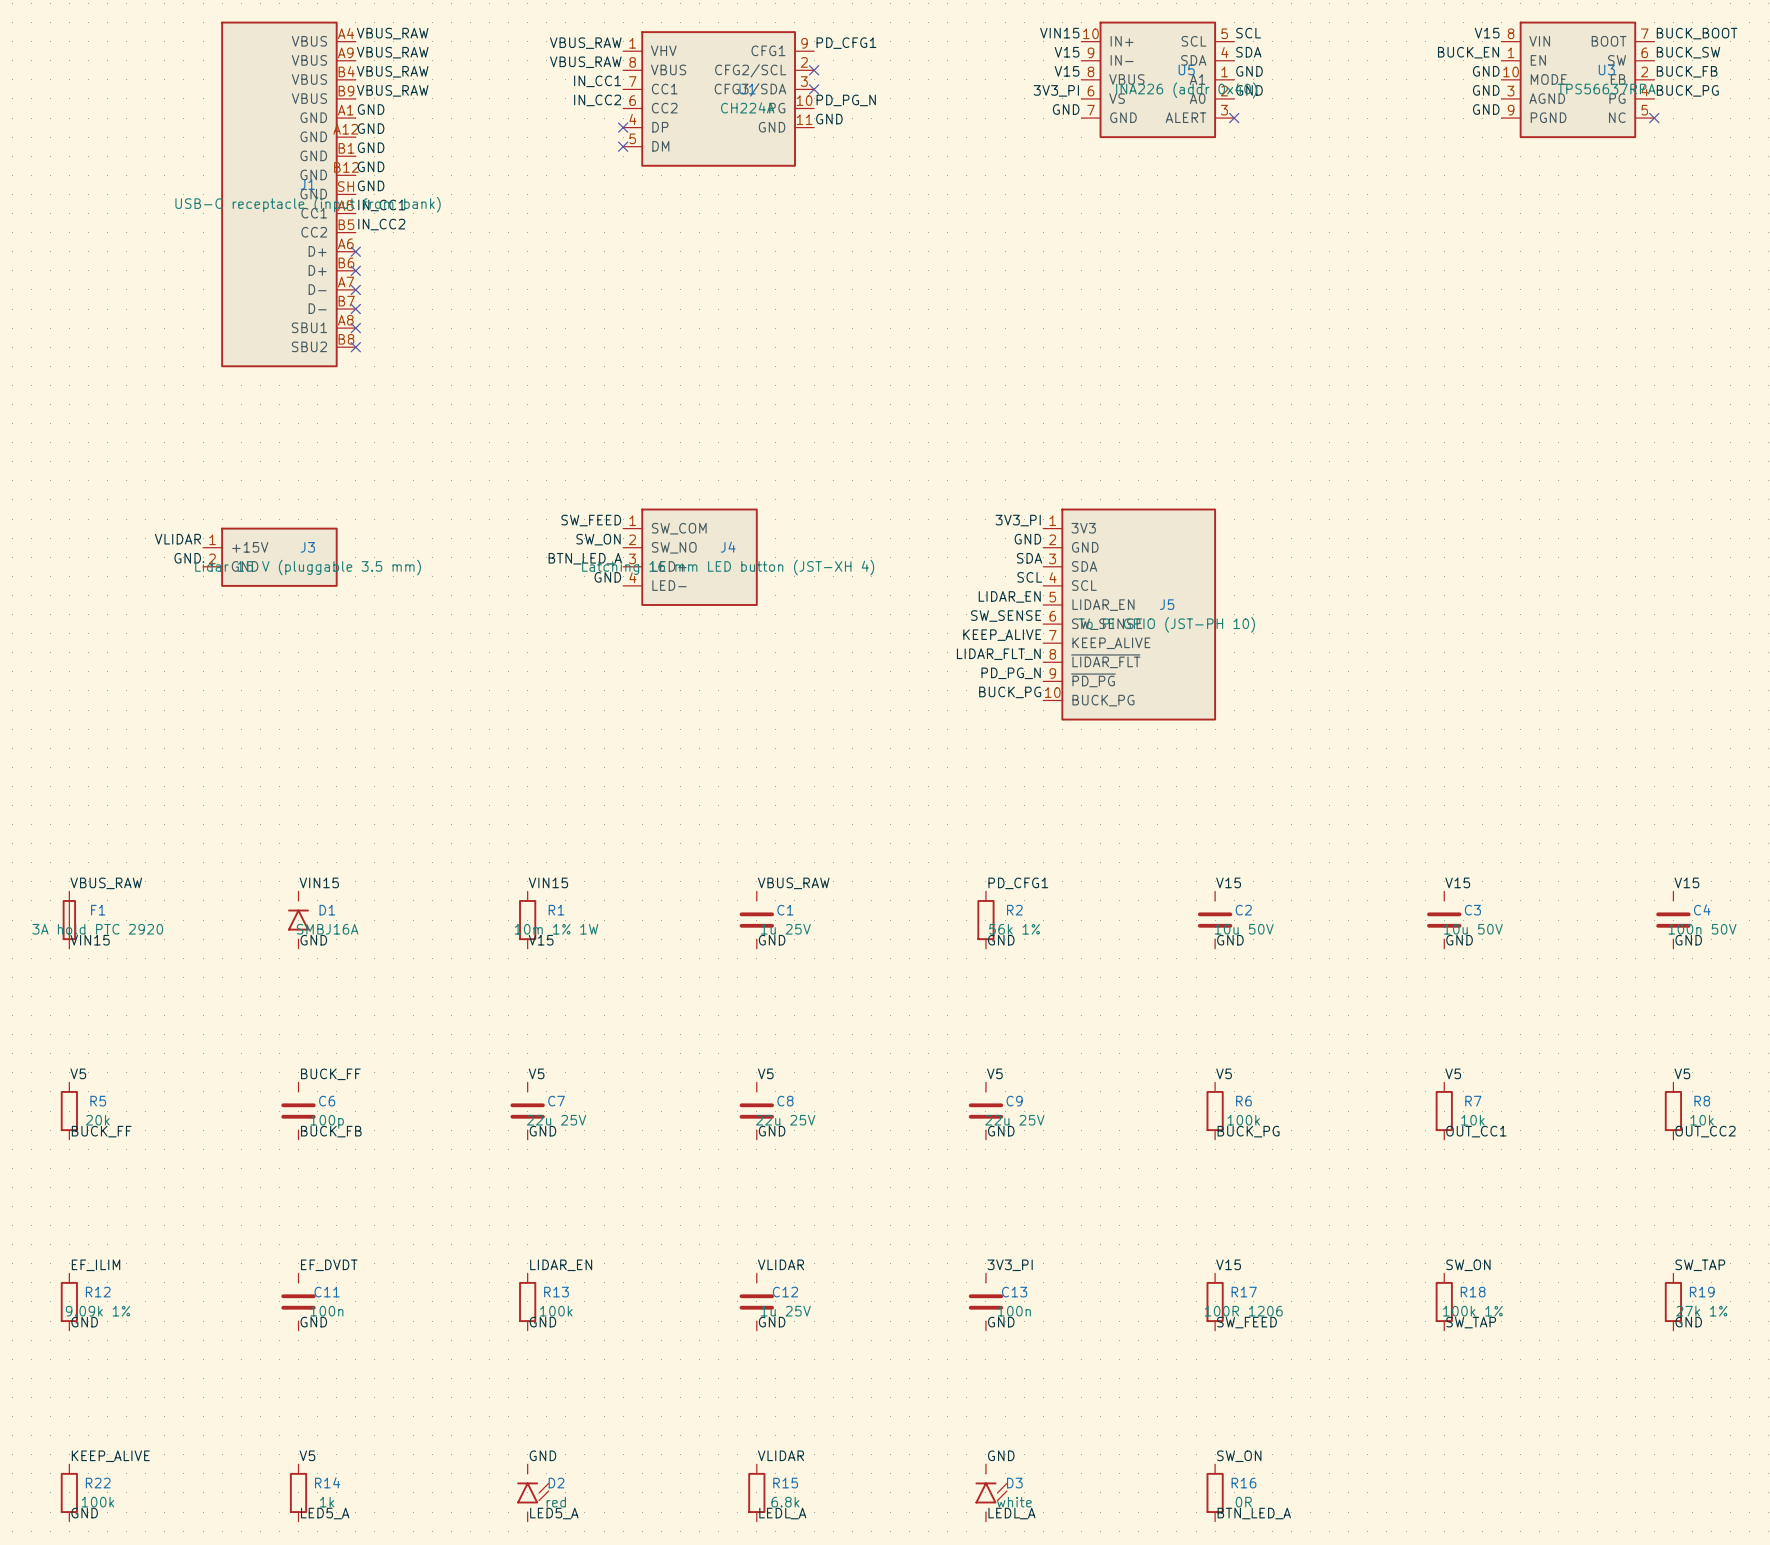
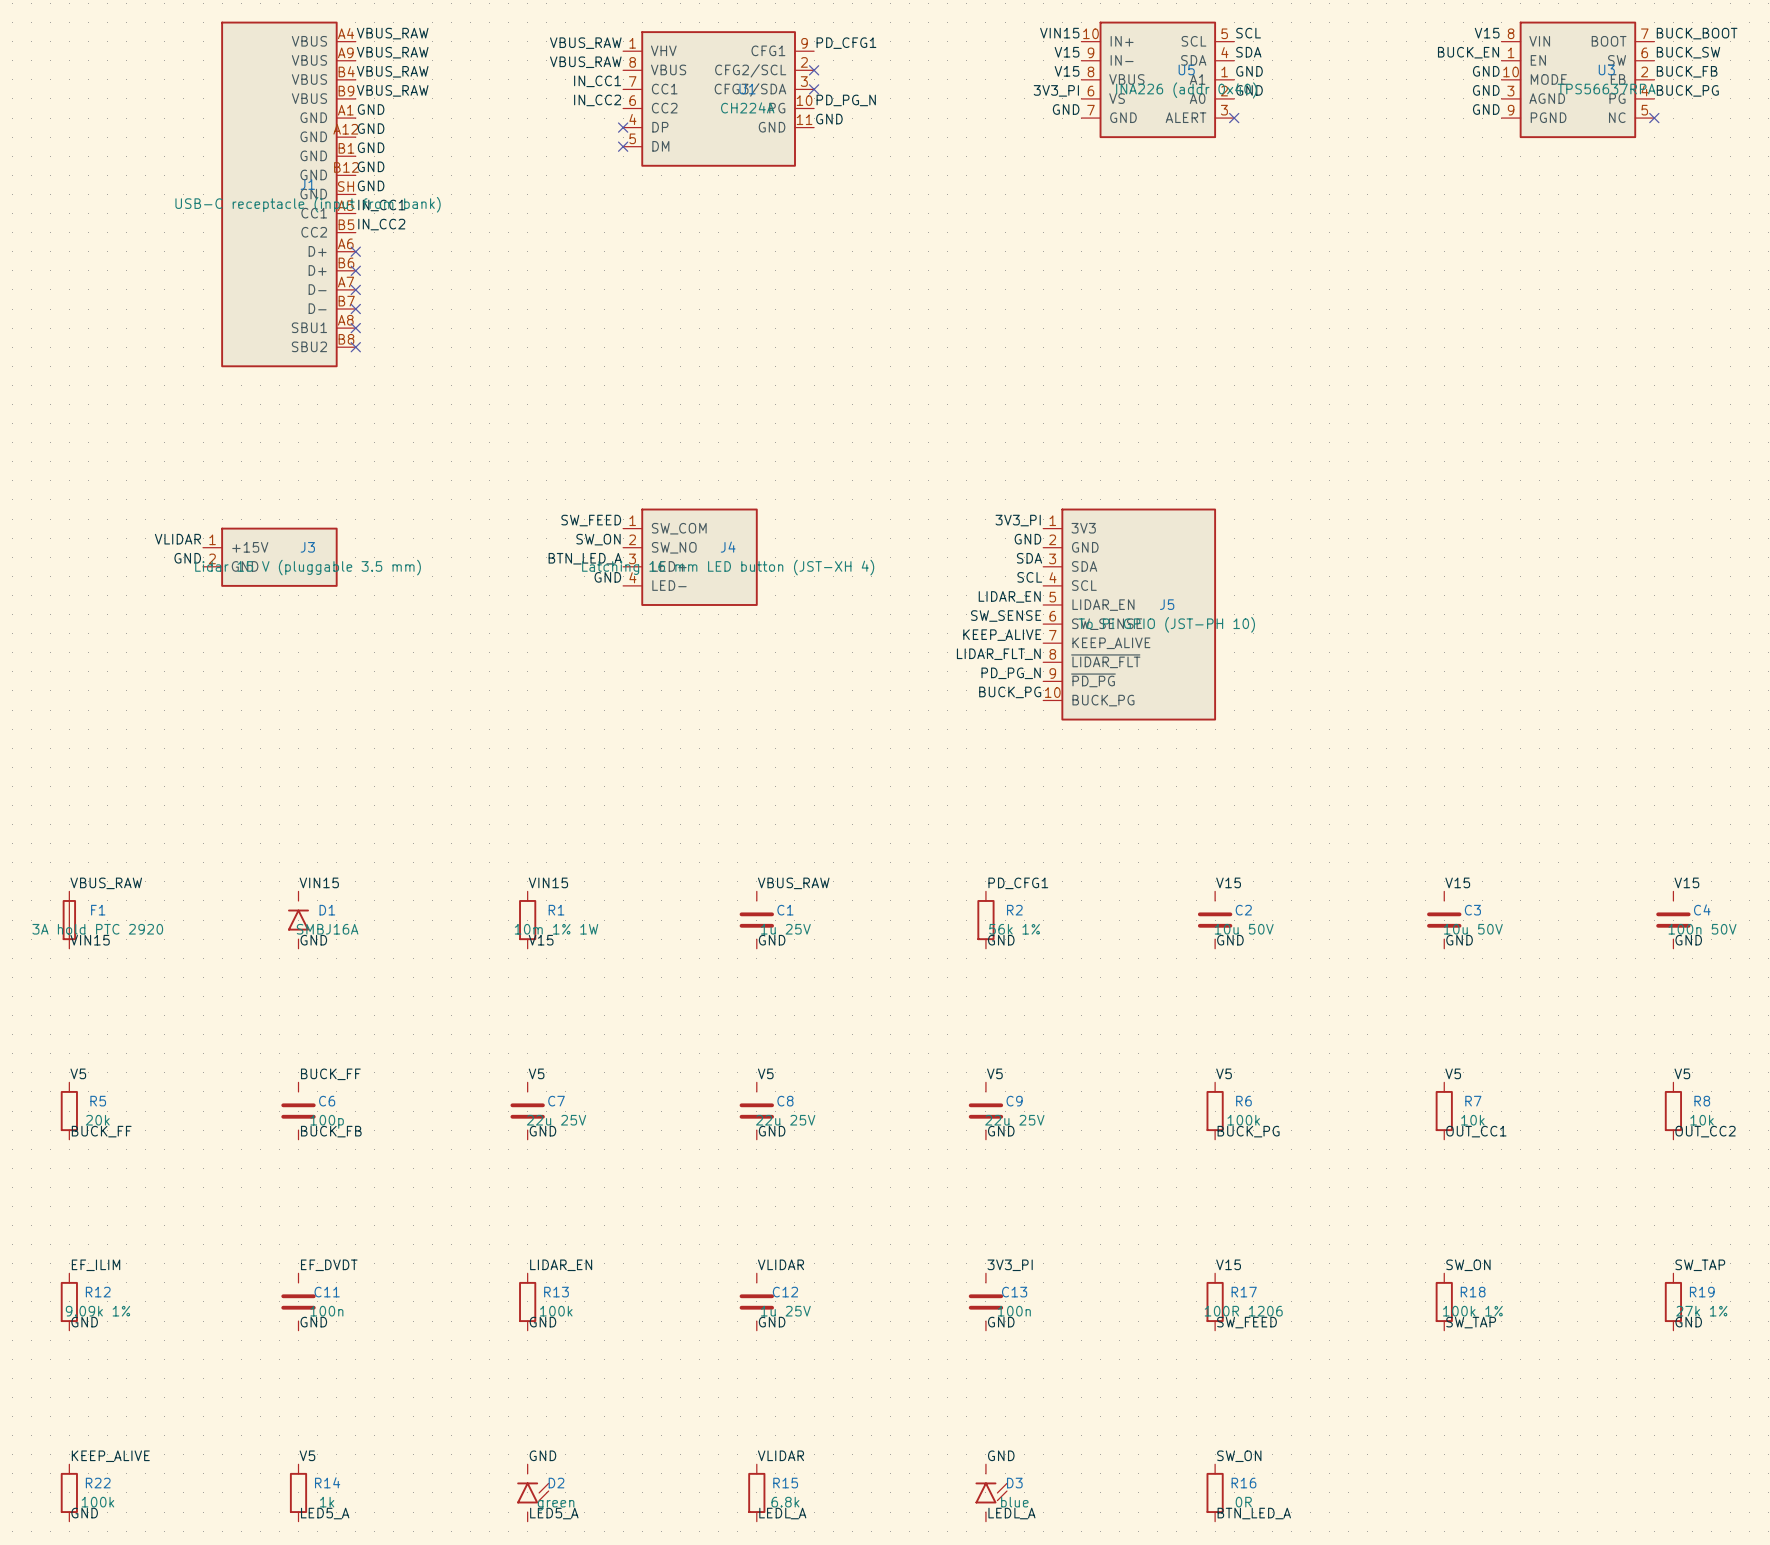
D2 value: red (556, 1502) -> green (556, 1505)
D3 value: white (1014, 1502) -> blue (1014, 1502)

